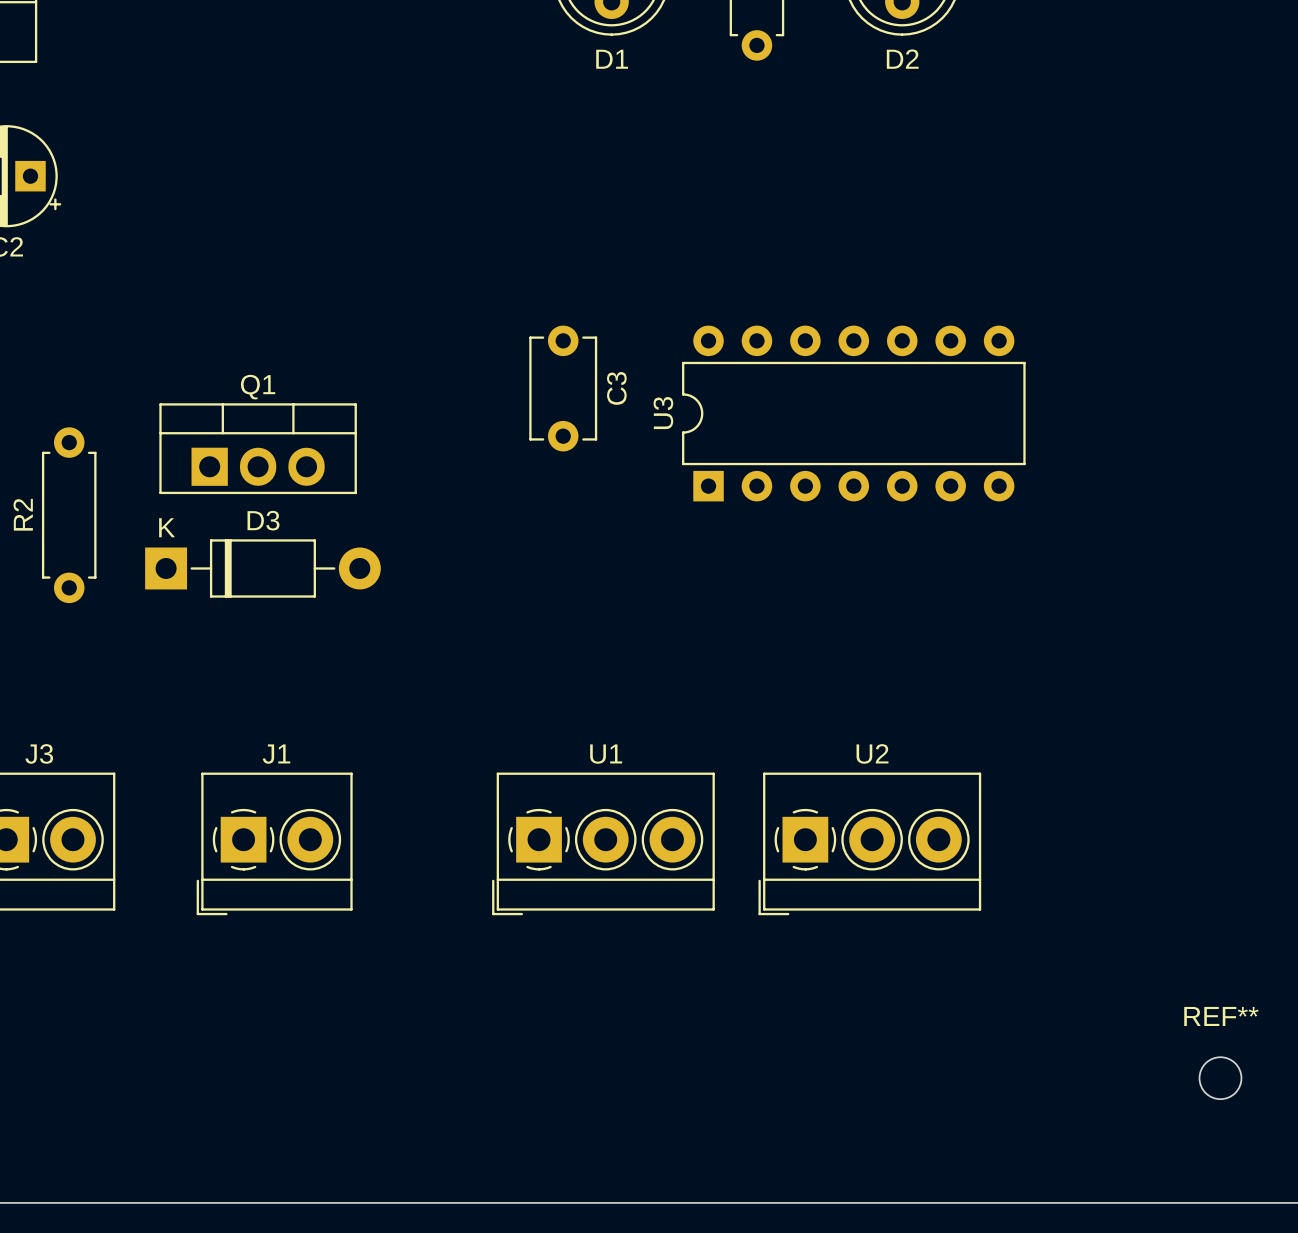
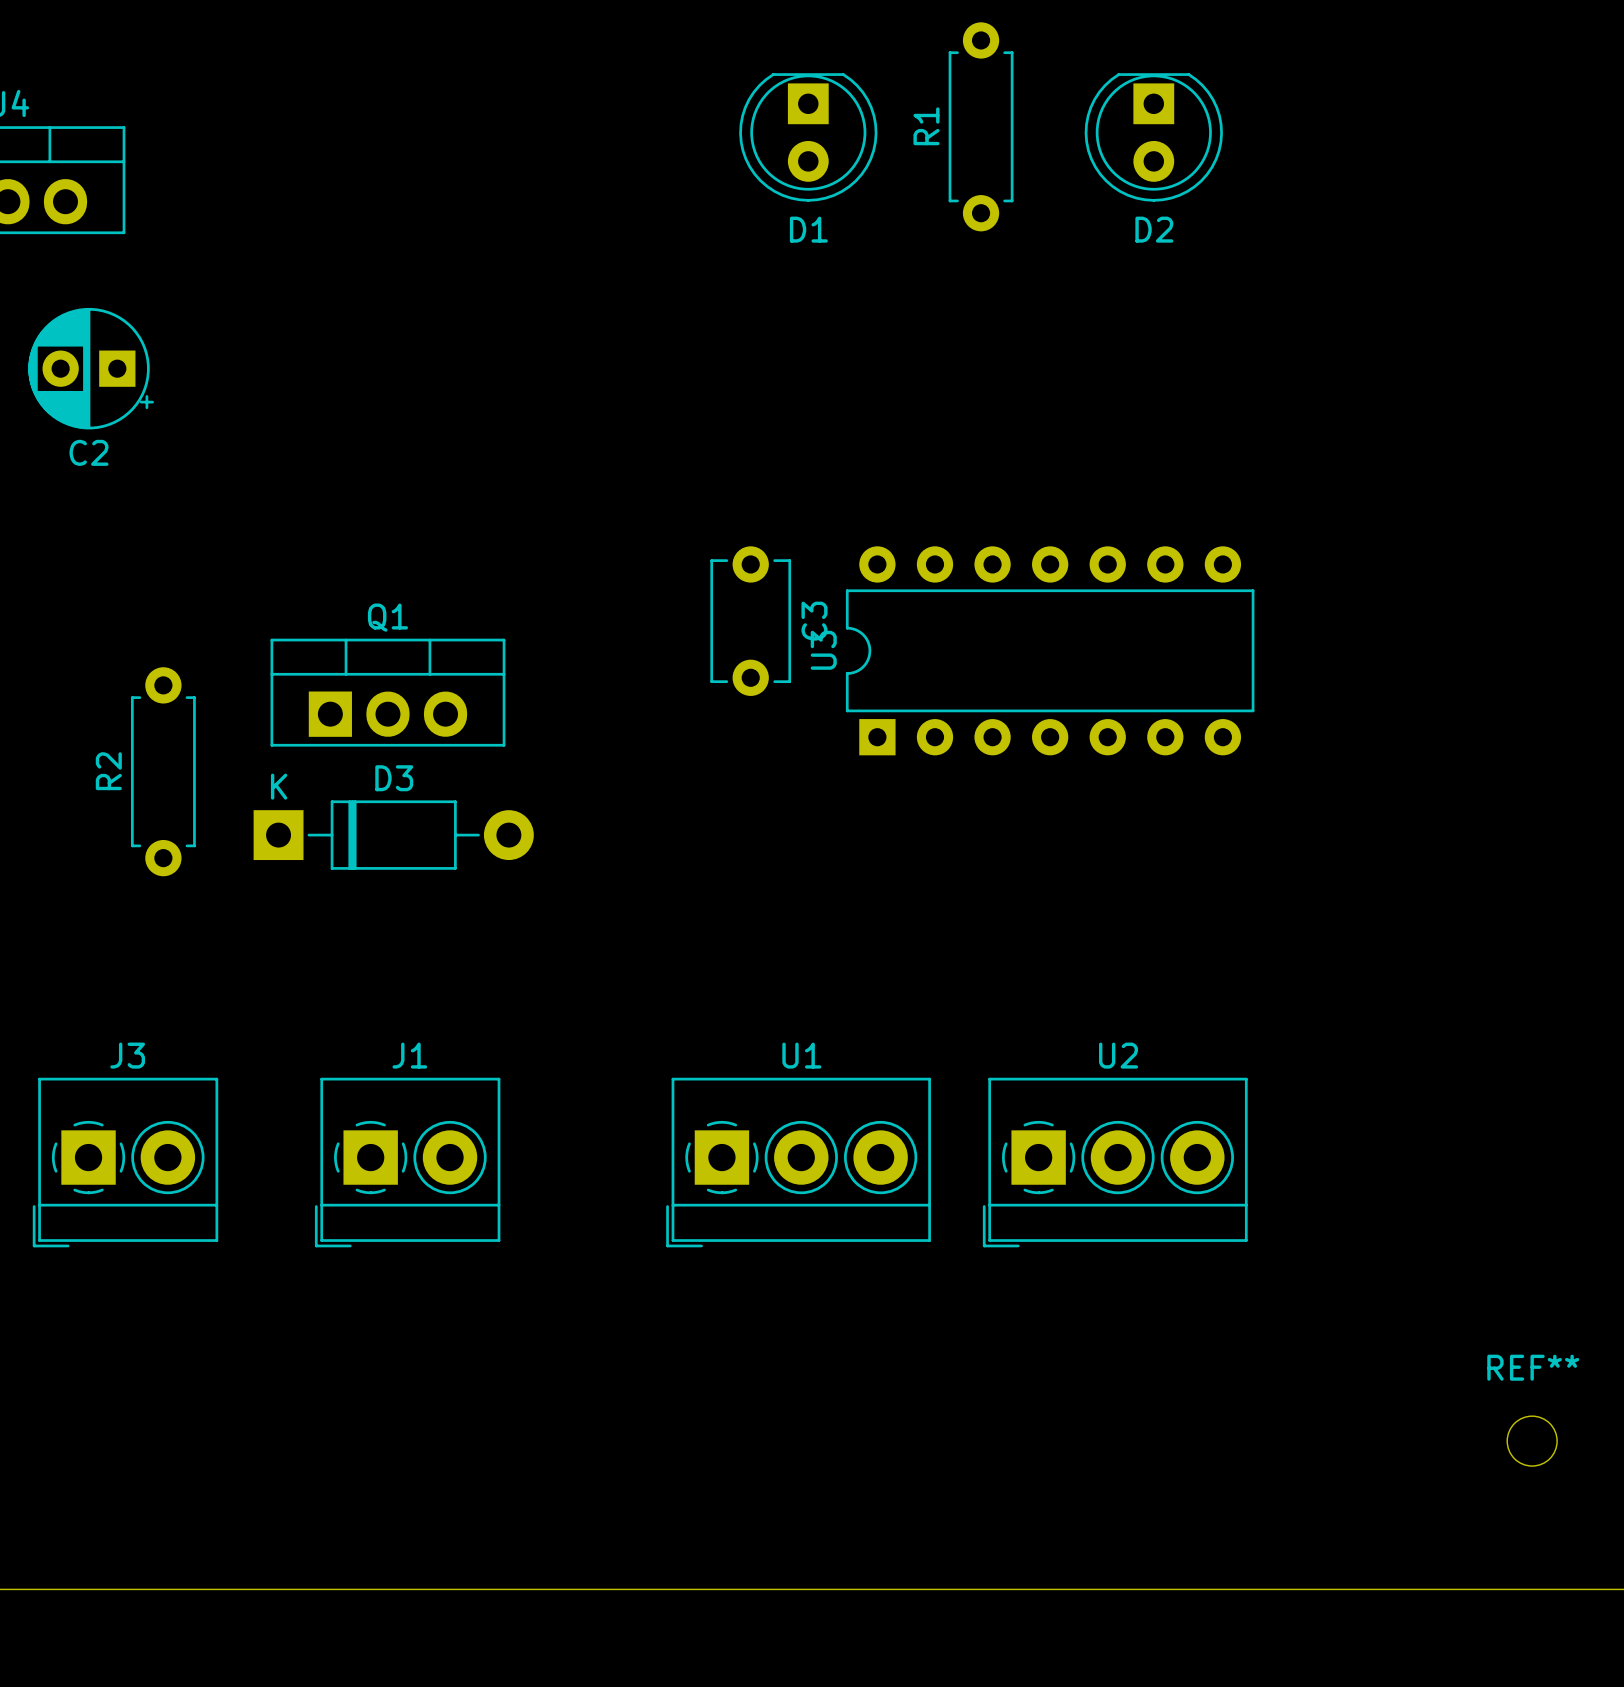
U3 position: (853, 413) -> (1050, 650)

